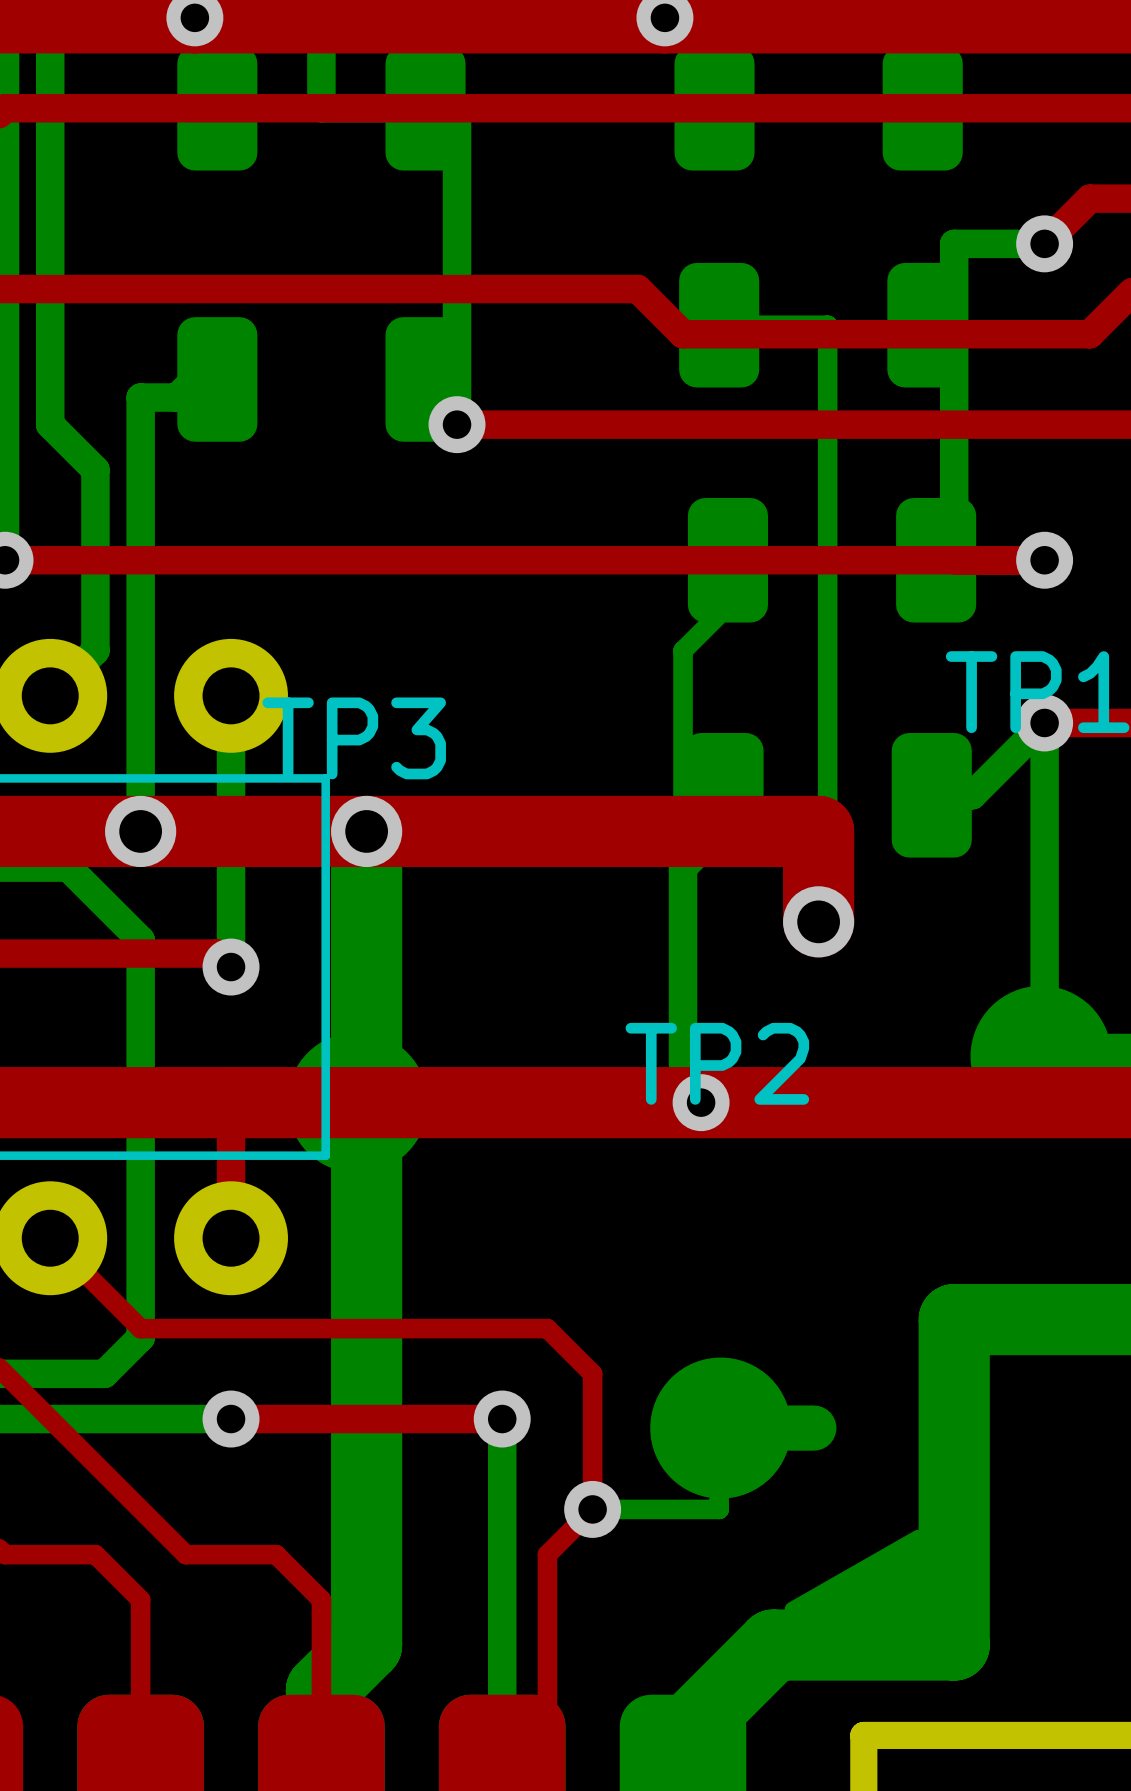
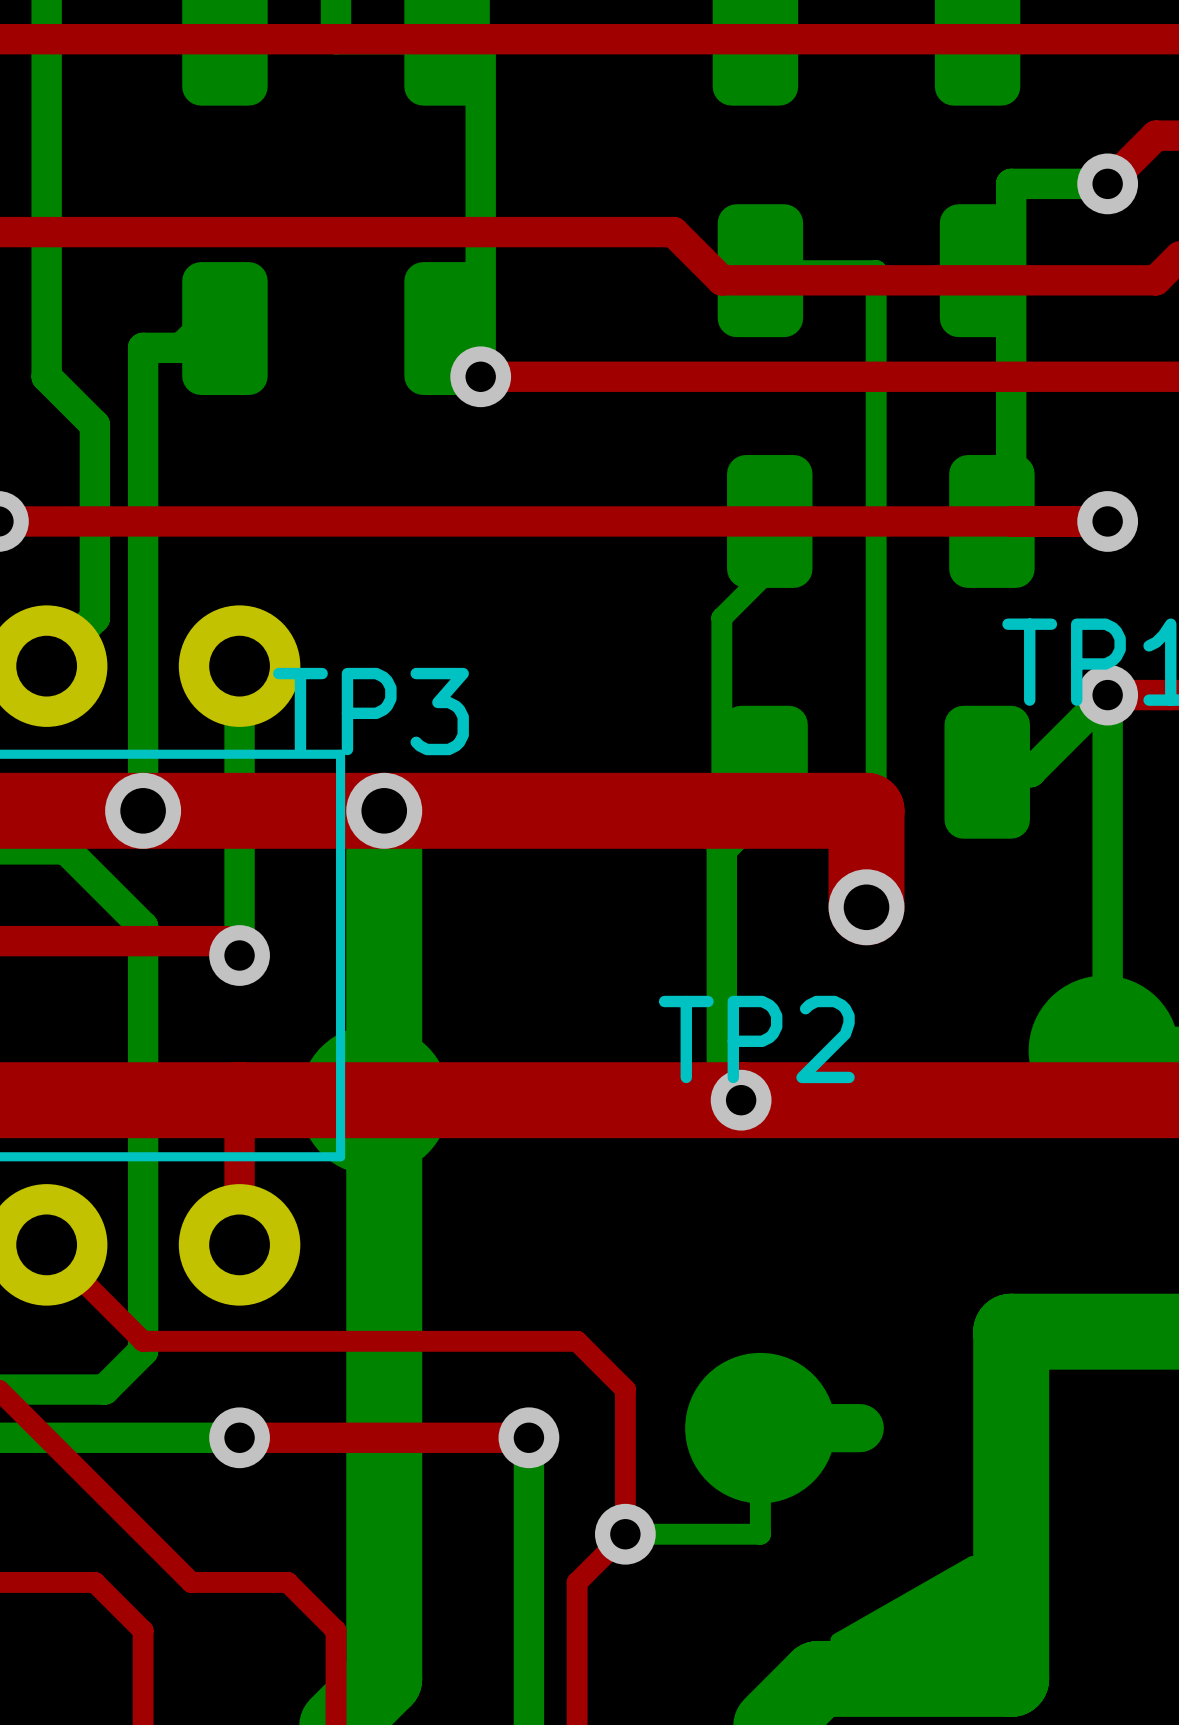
TP2 position: (743, 1428) -> (784, 1428)

